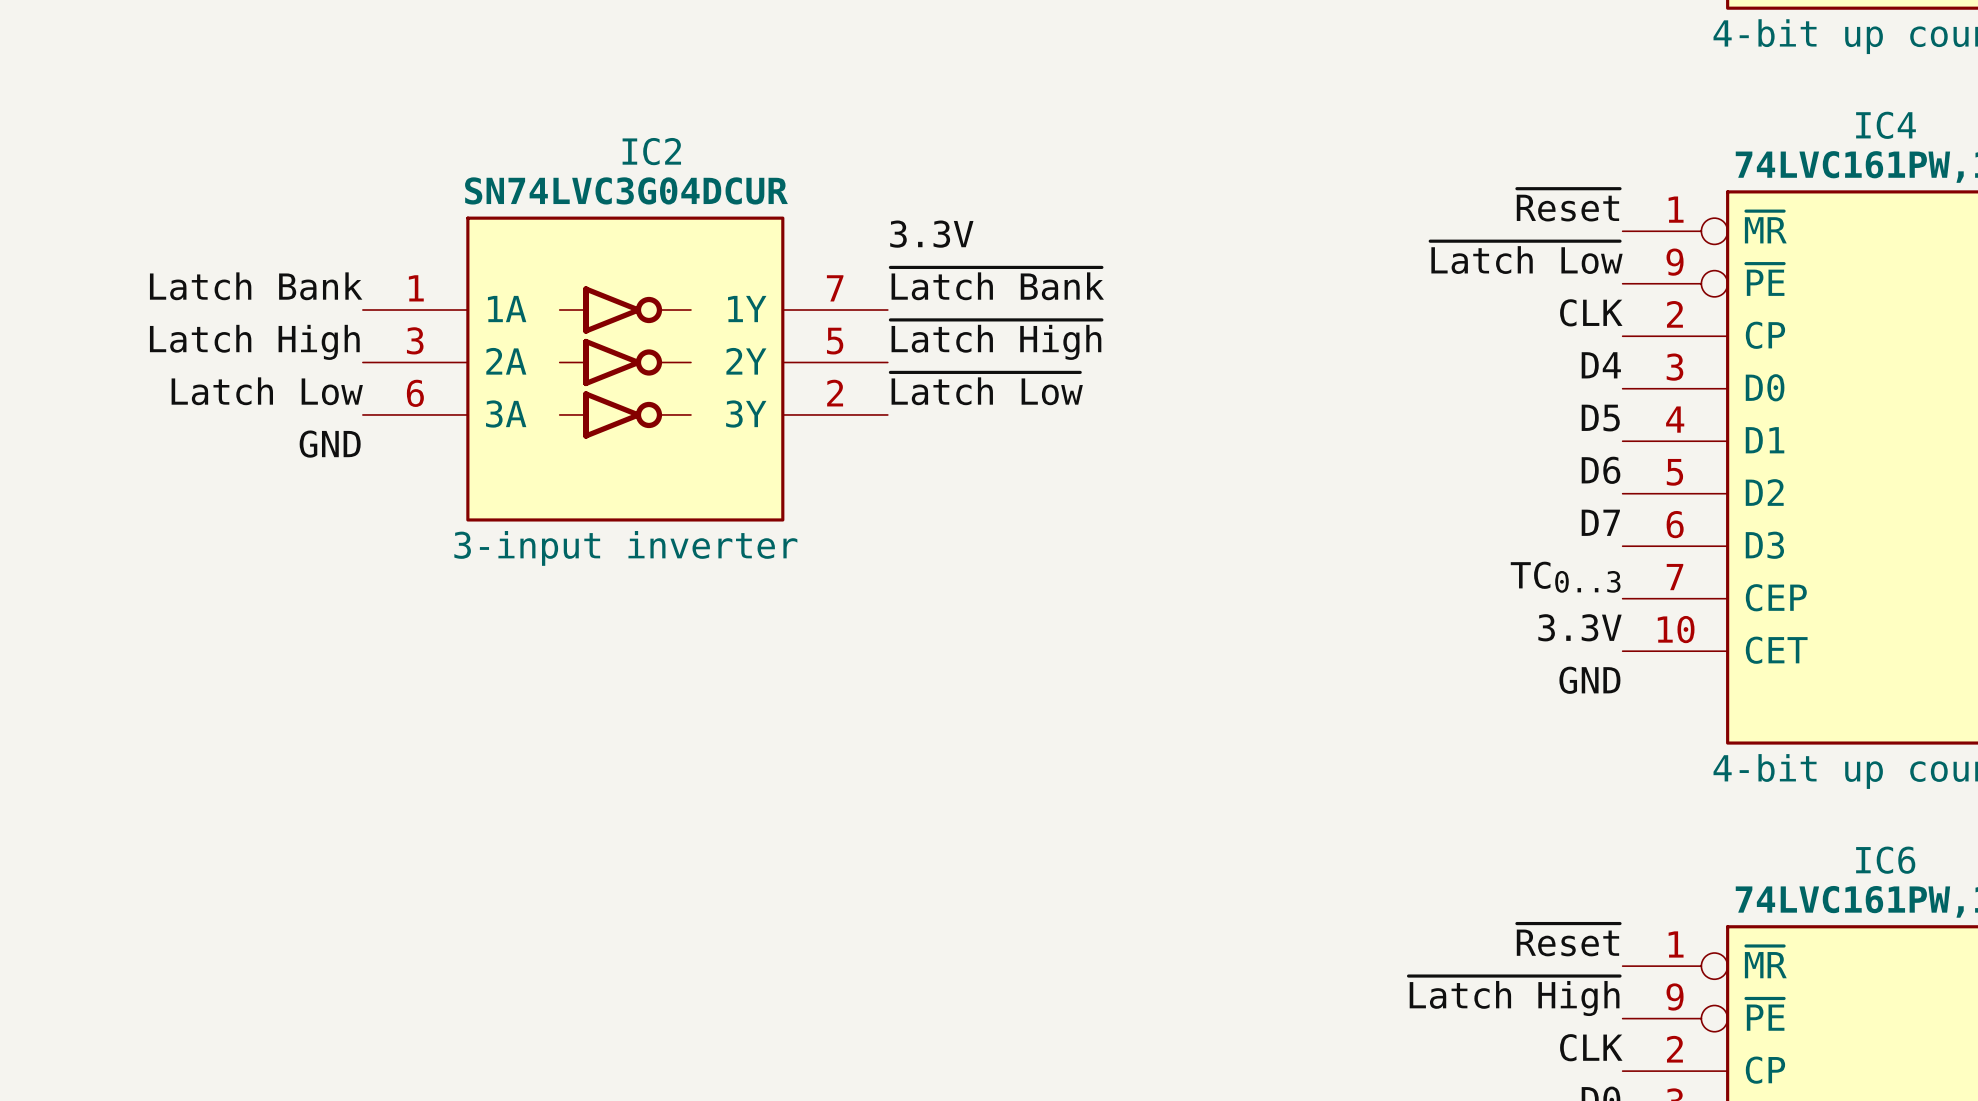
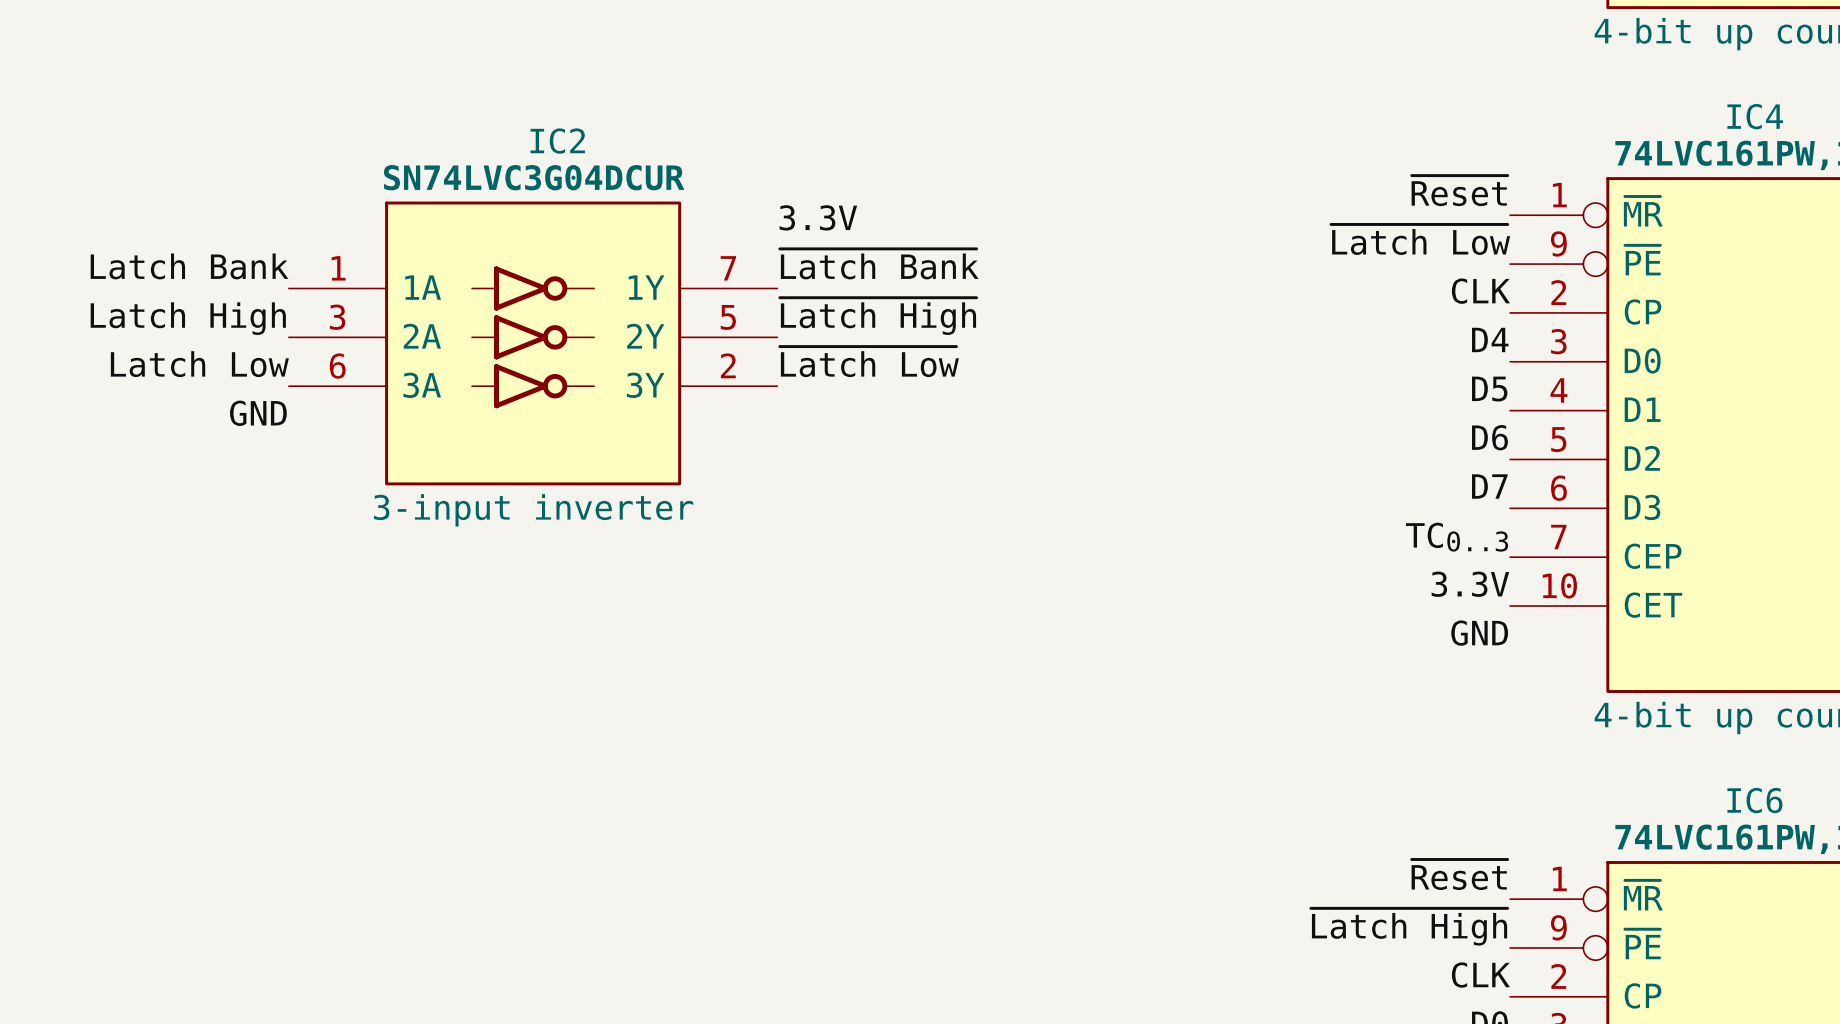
label position: 3.3V (931, 234) -> 3.3V (818, 217)
label position: ~{Latch Bank} (997, 283) -> ~{Latch Bank} (879, 264)
label position: Latch Bank (256, 286) -> Latch Bank (189, 266)
label position: ~{Latch High} (996, 339) -> ~{Latch High} (878, 316)
label position: Latch High (254, 342) -> Latch High (188, 318)
IC2 position: (625, 369) -> (533, 343)
label position: ~{Latch Low} (986, 388) -> ~{Latch Low} (869, 361)
label position: Latch Low (267, 391) -> Latch Low (199, 364)
label position: GND (330, 444) -> GND (258, 413)

